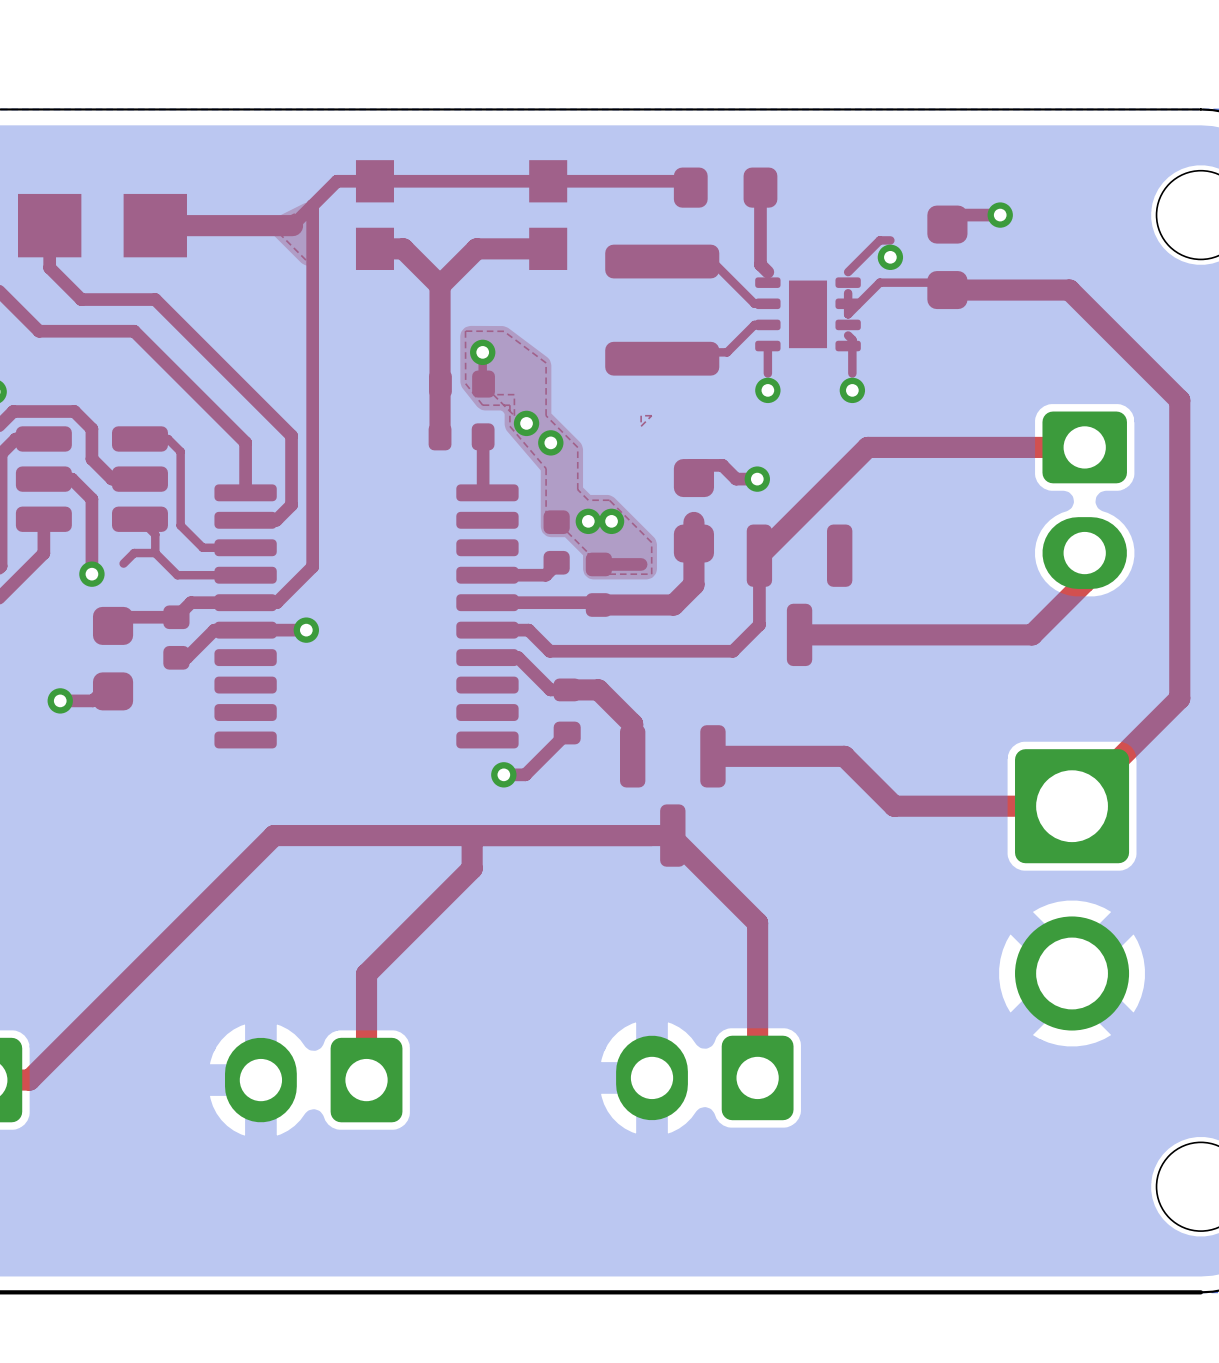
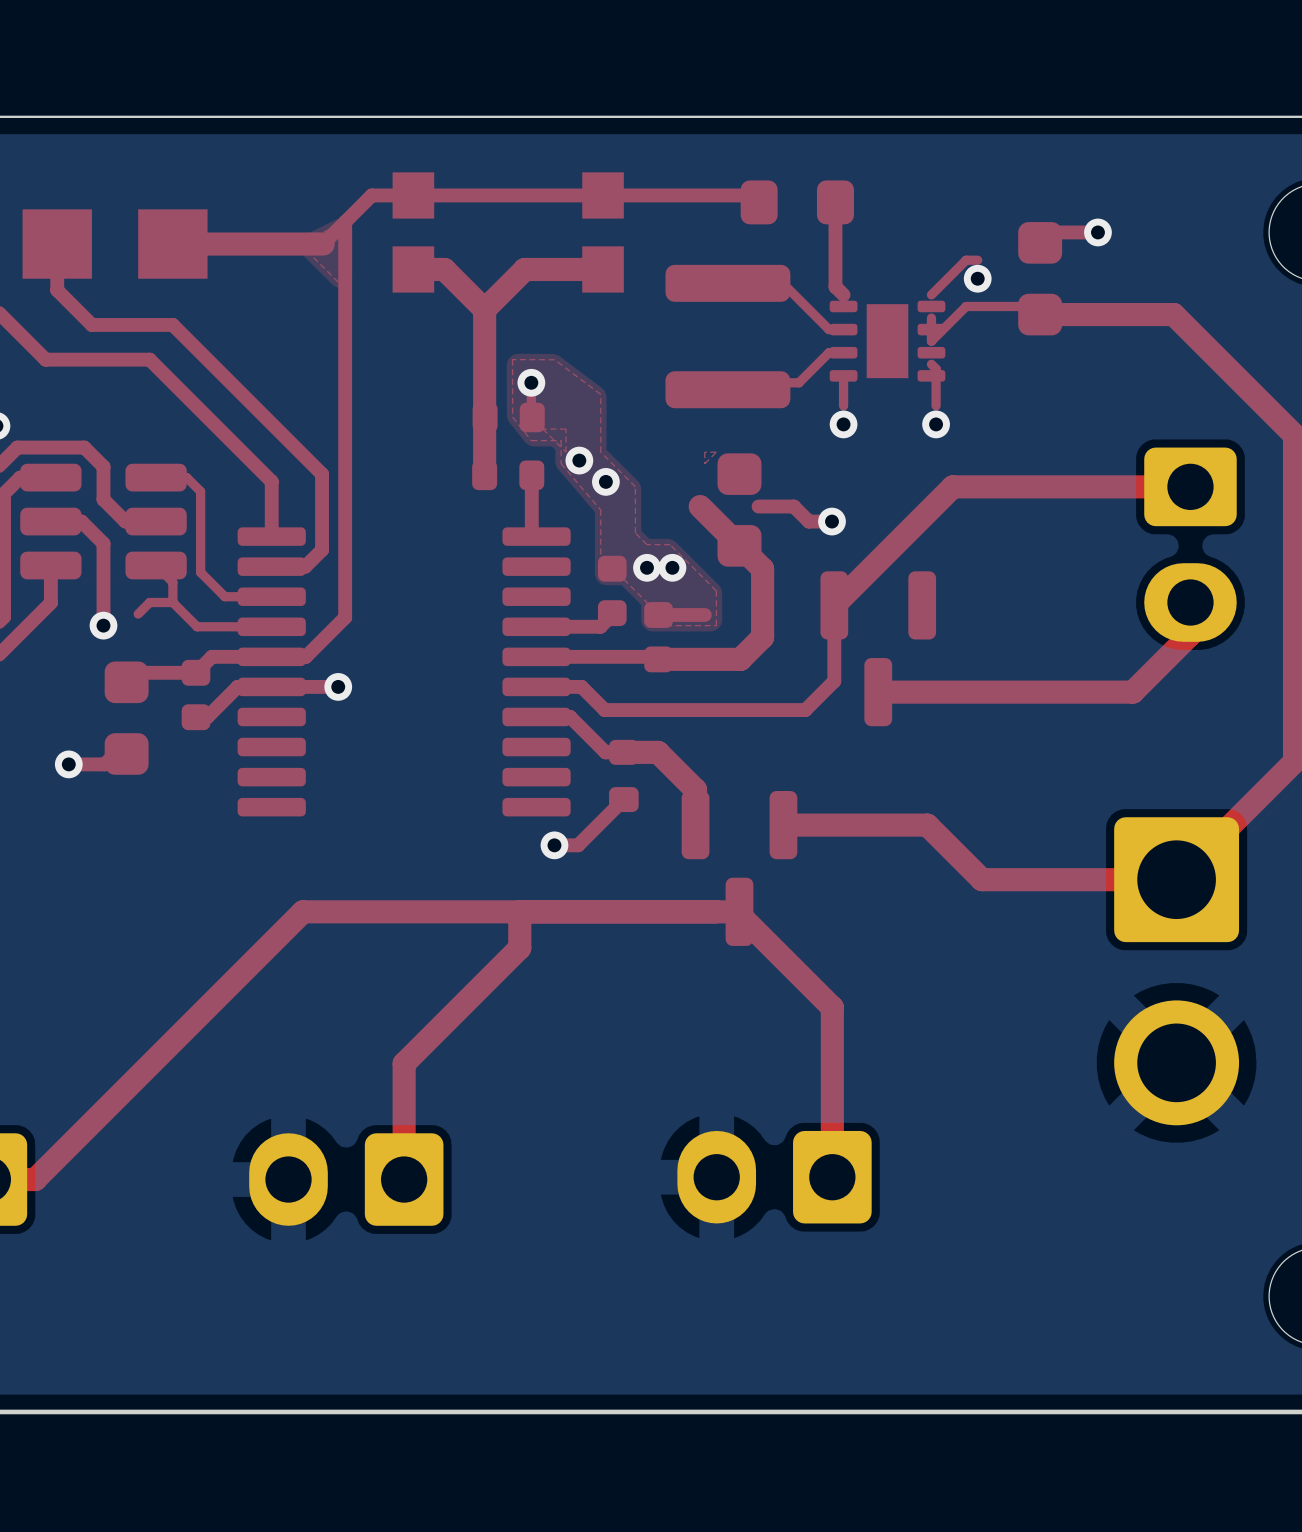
top track: none -> (700, 506) (762, 568)
part position: (693, 510) -> (739, 509)

